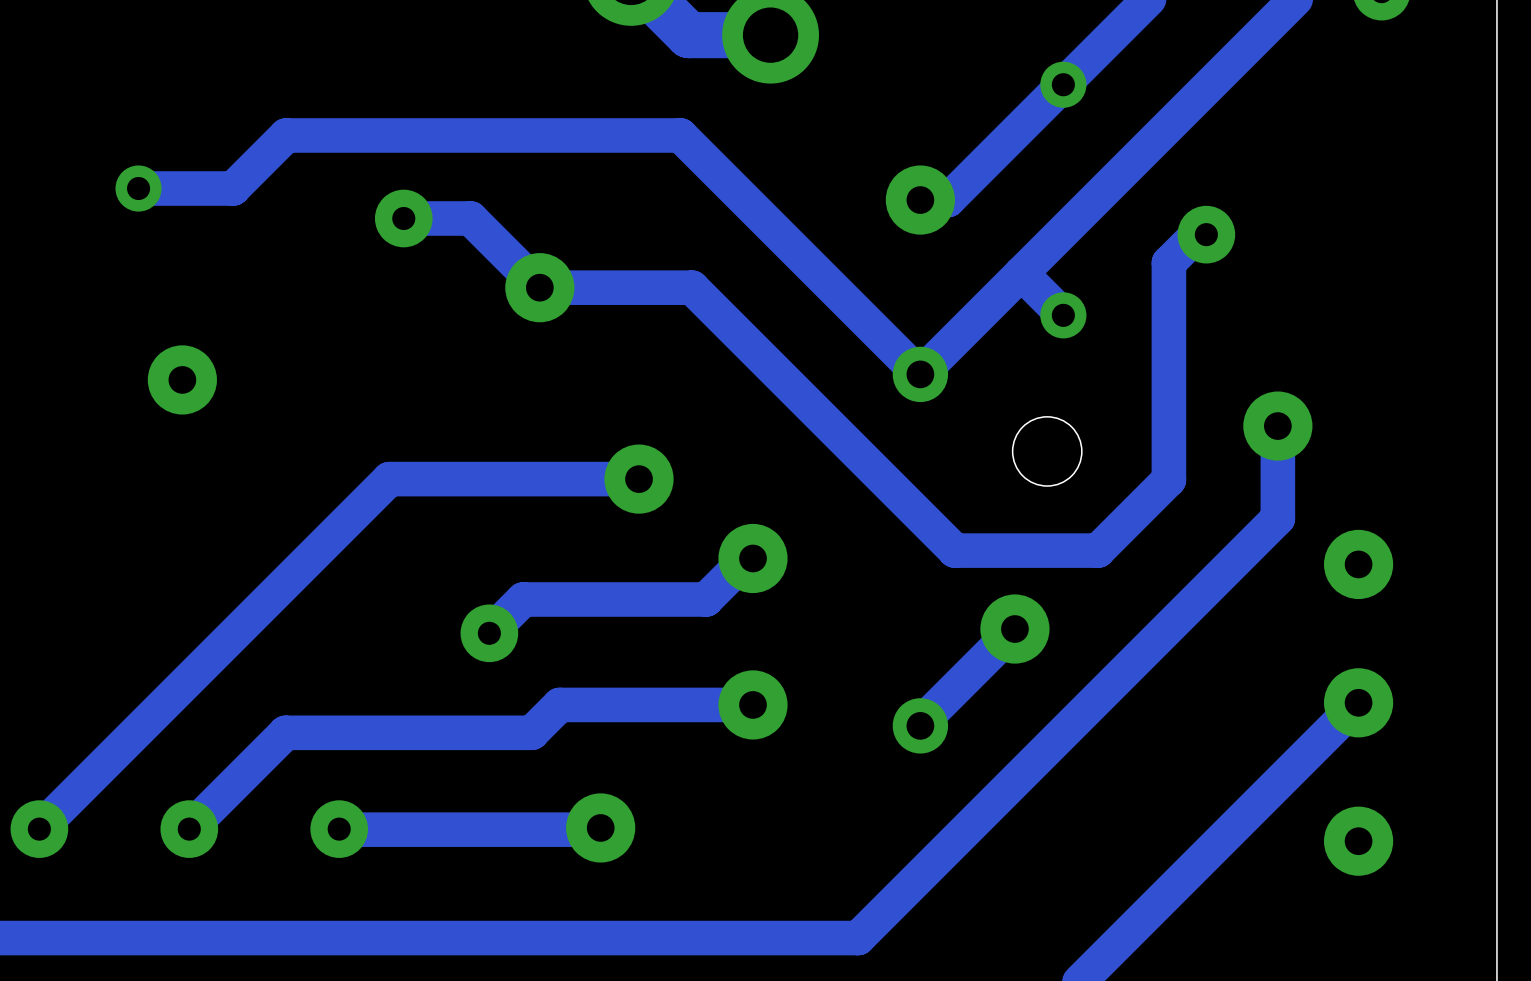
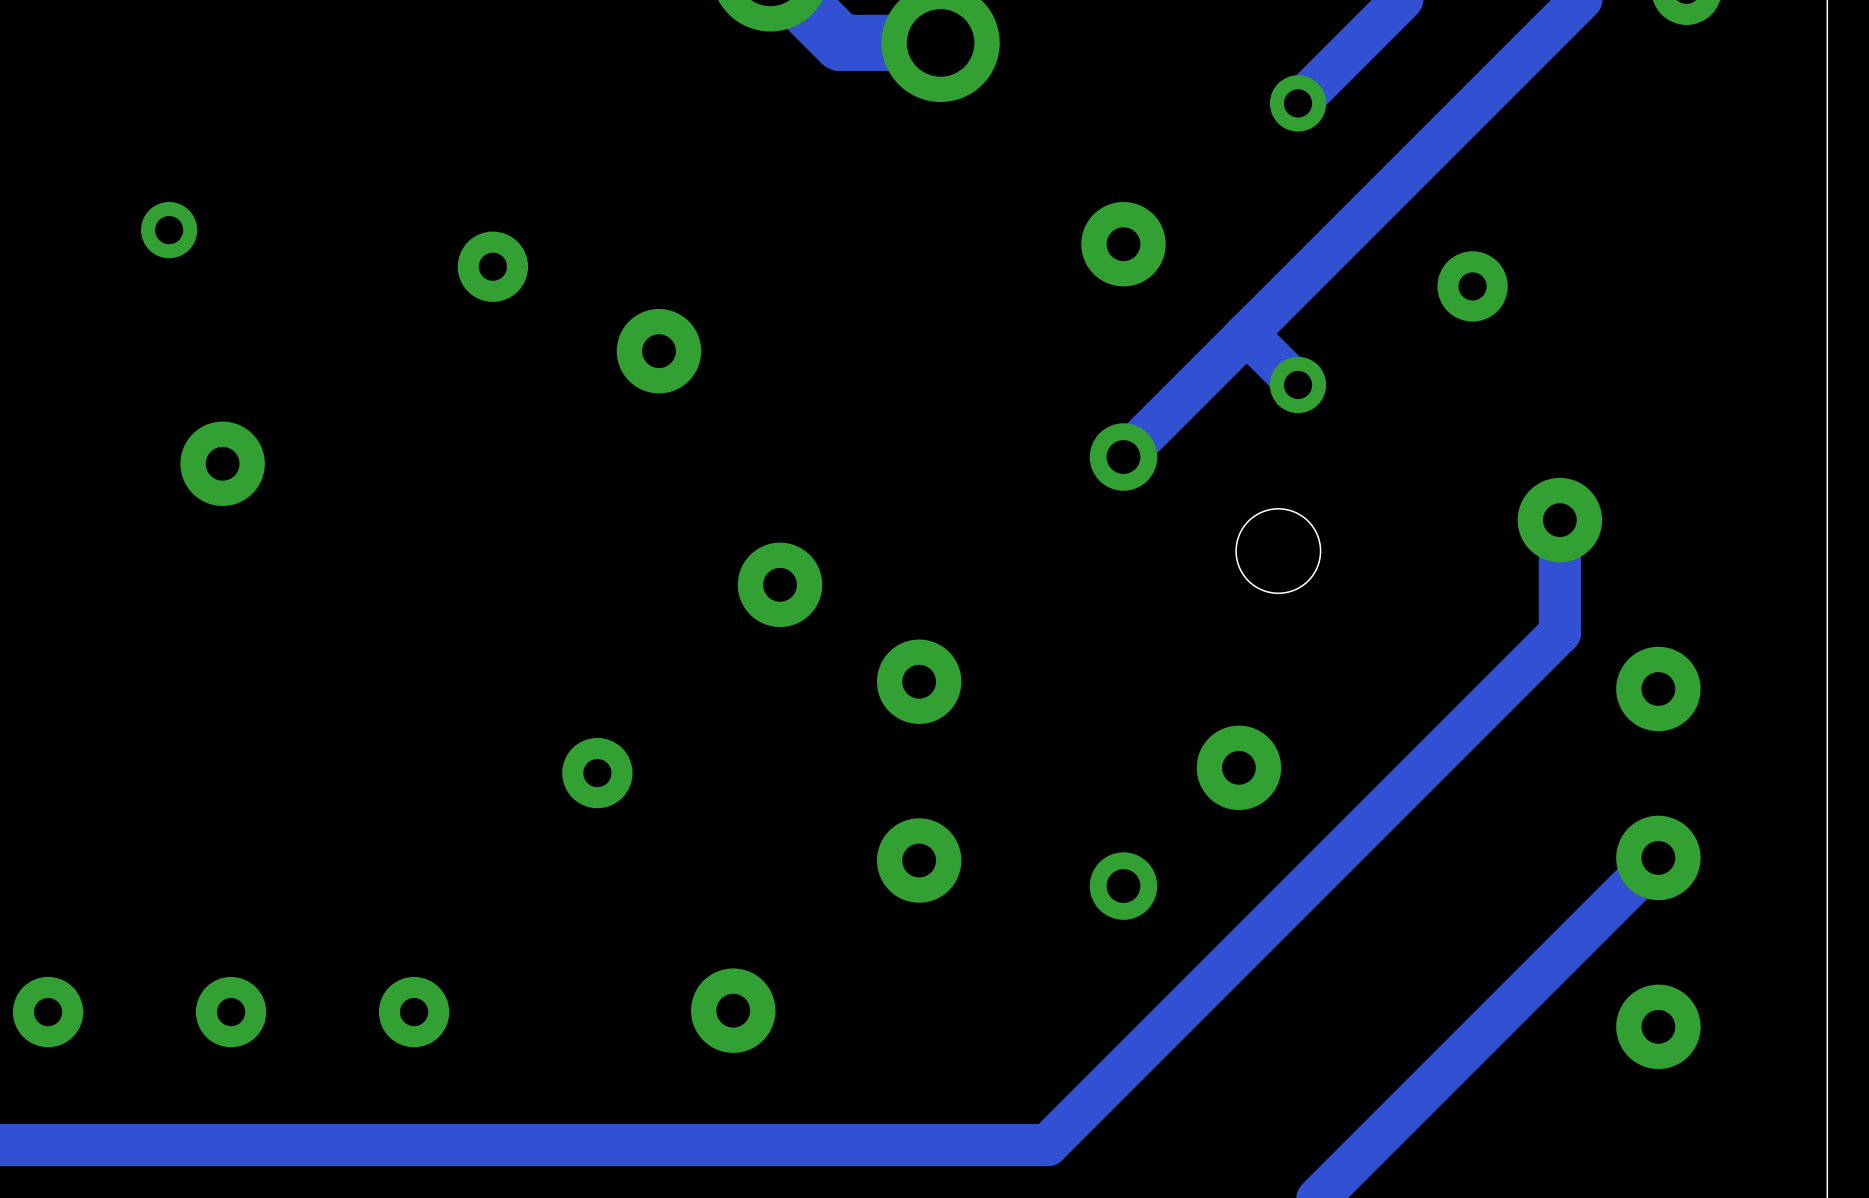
track: (1063, 84) (948, 200) (920, 200) -> none
track: (138, 188) (233, 188) (286, 135) (680, 135) (920, 374) -> none
track: (403, 218) (470, 218) (539, 287) (692, 287) (954, 550) (1097, 550) (1168, 479) (1168, 262) (1197, 234) (1206, 234) -> none
track: (639, 479) (389, 479) (39, 829) -> none
track: (753, 558) (747, 558) (706, 599) (523, 599) (489, 633) -> none
track: (1014, 629) (920, 723) -> none
track: (753, 704) (559, 704) (531, 732) (285, 732) (189, 829) -> none
track: (600, 827) (598, 829) (339, 829) -> none

